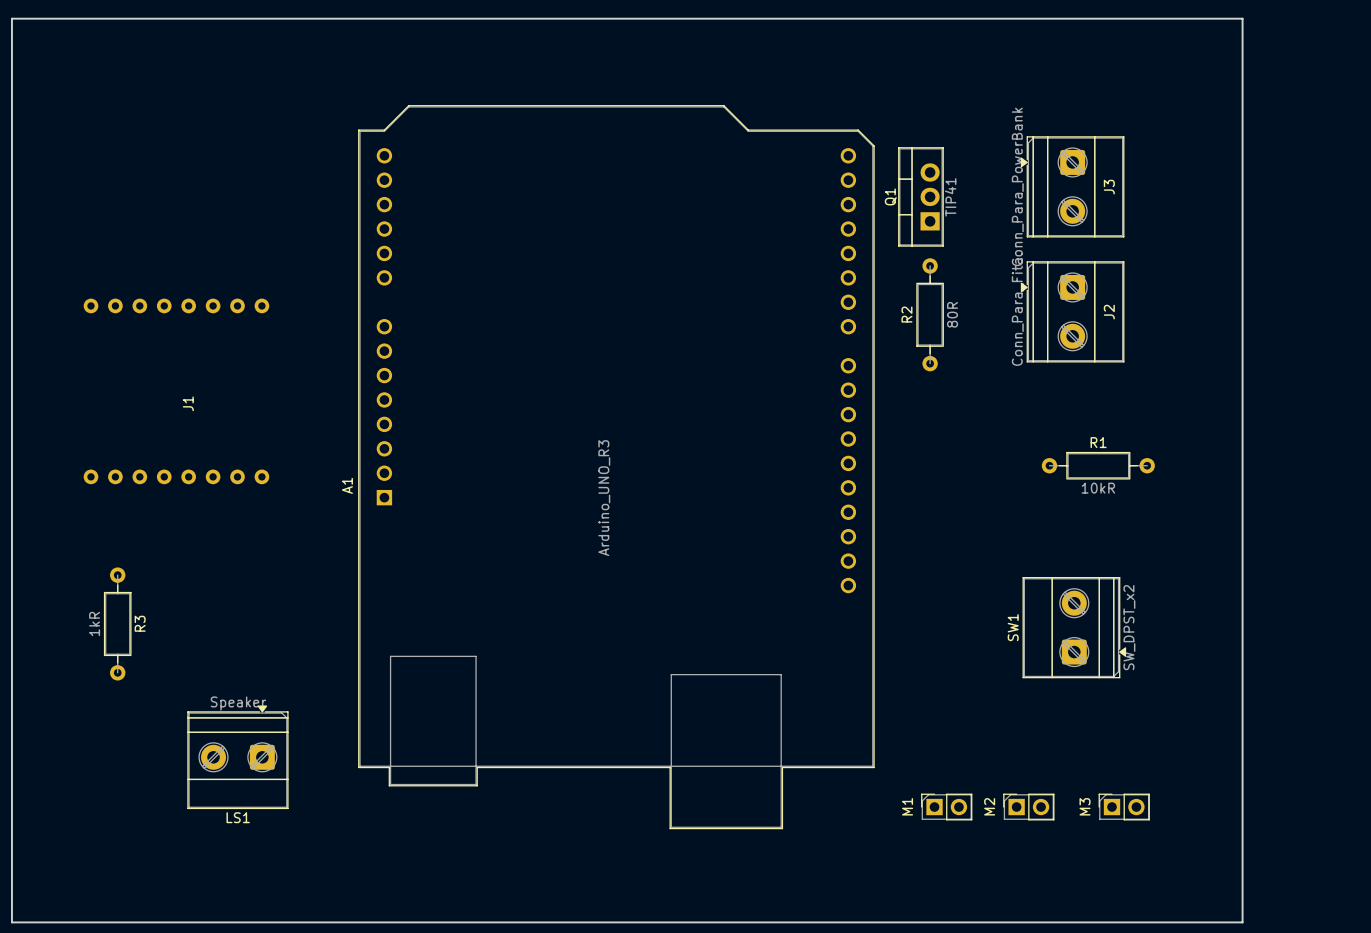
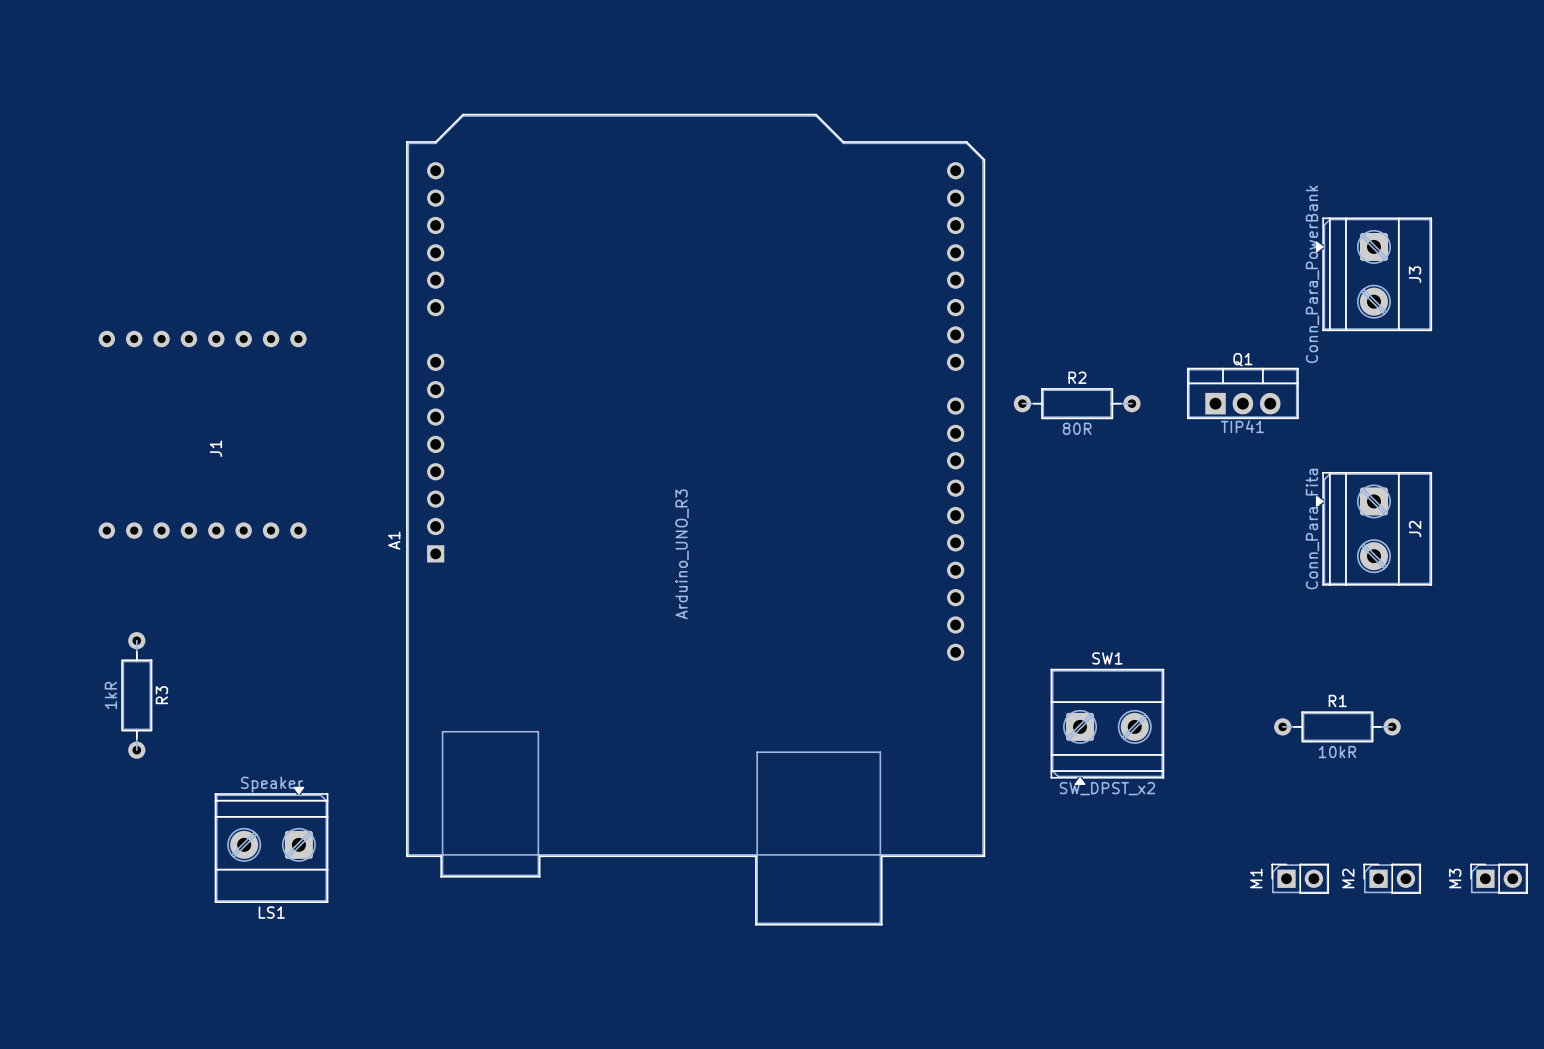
board edge: (11, 18) (1242, 18) (1242, 922) (11, 922) (11, 18) -> none
J3 position: (1072, 186) -> (1373, 274)
Q1 rotation: 0° (920, 196) -> 90° clockwise (1242, 393)
Q1 position: (920, 196) -> (1242, 393)
J2 position: (1072, 311) -> (1373, 528)
R2 rotation: 0° (930, 314) -> 90° clockwise (1077, 403)
R1 position: (1098, 465) -> (1337, 726)
SW1 rotation: 0° (1074, 627) -> 90° clockwise (1107, 726)
SW1 position: (1074, 627) -> (1107, 726)
M1 position: (946, 807) -> (1300, 878)
M2 position: (1028, 807) -> (1392, 878)
M3 position: (1124, 807) -> (1499, 878)

